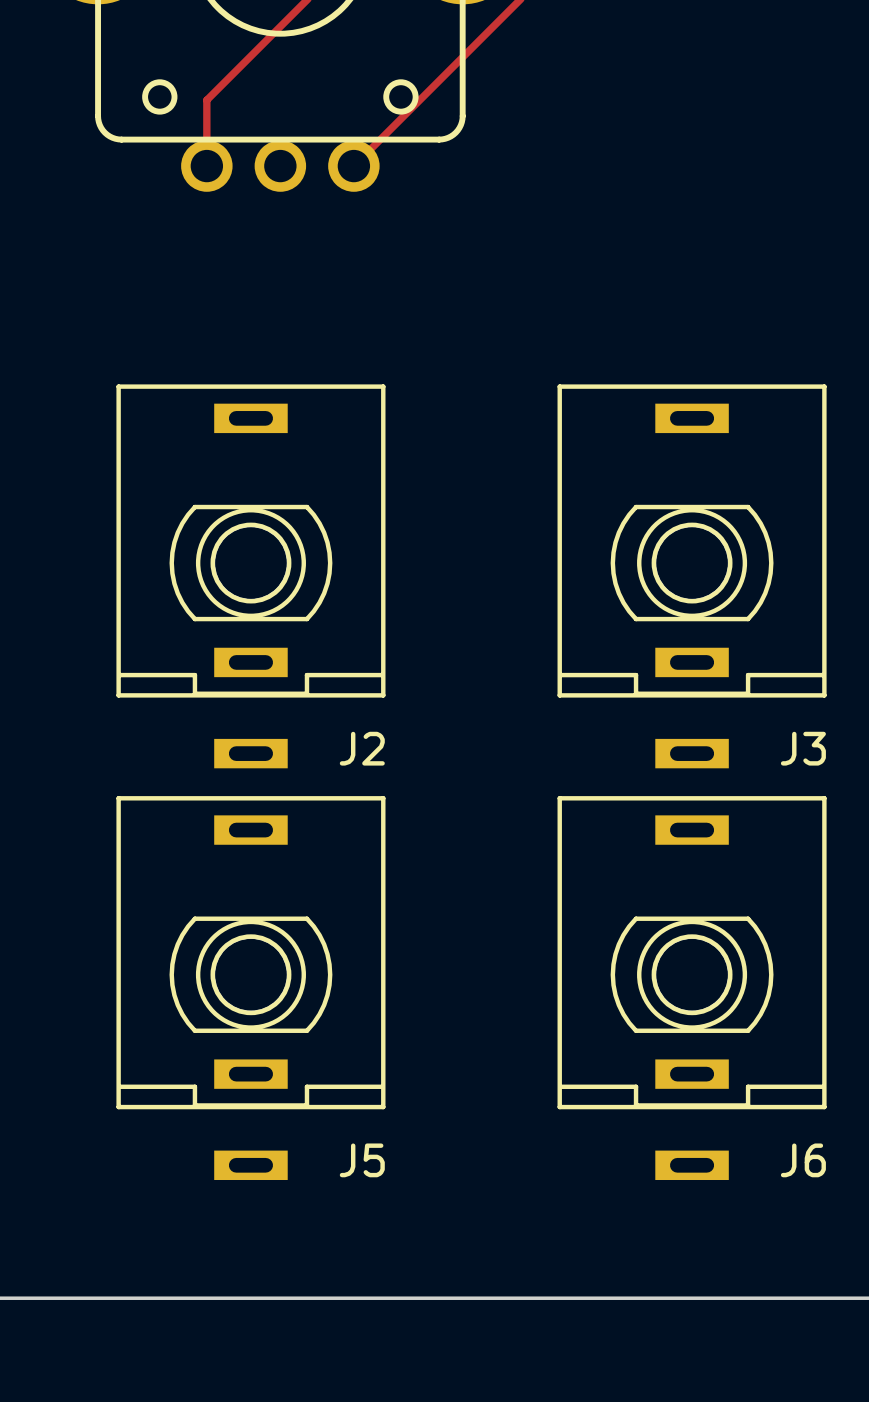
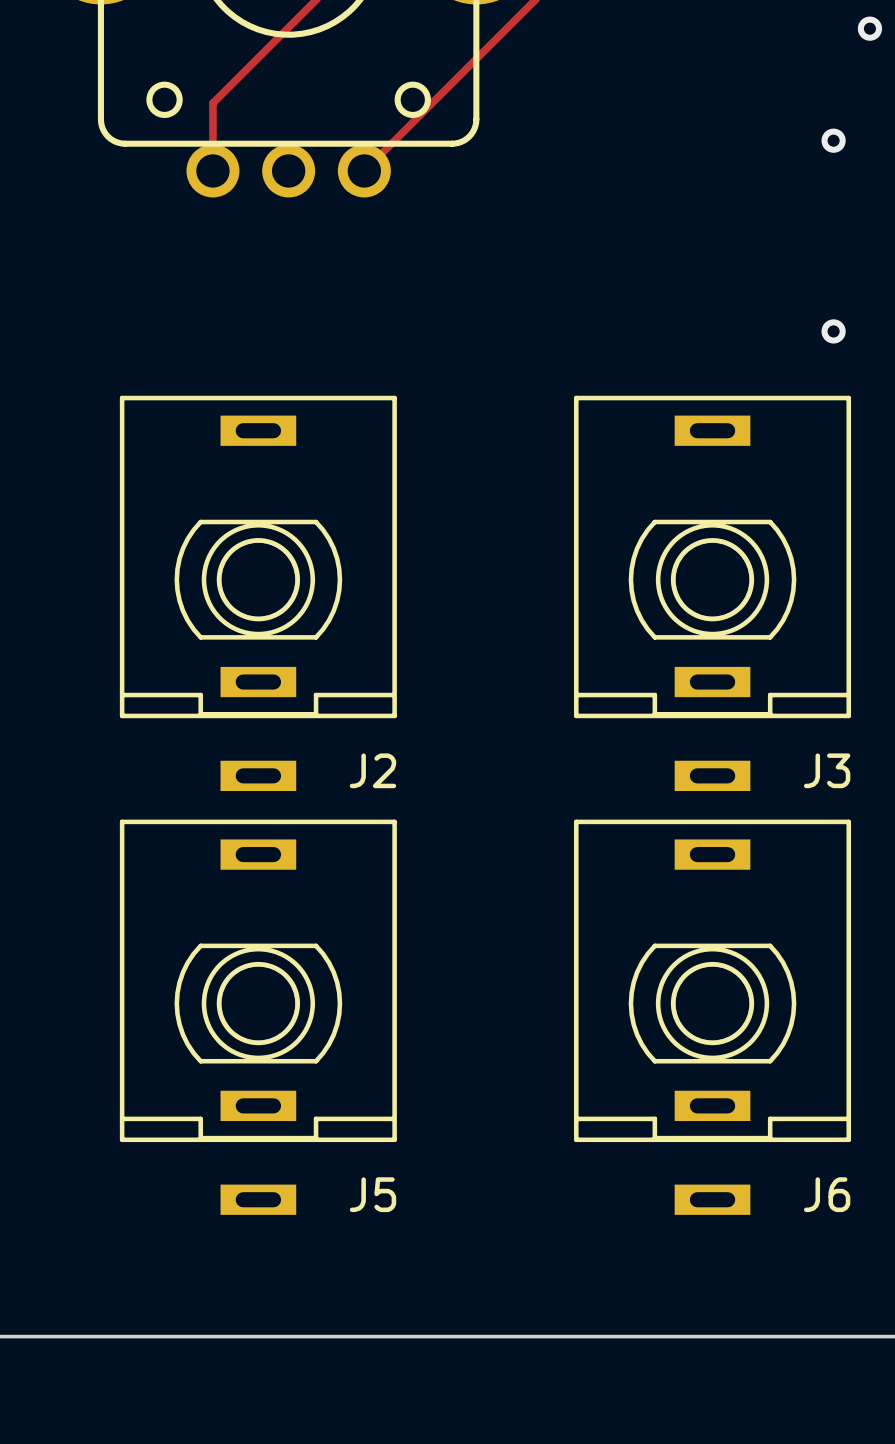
via: none -> (869, 28)
via: none -> (833, 140)
via: none -> (833, 331)

